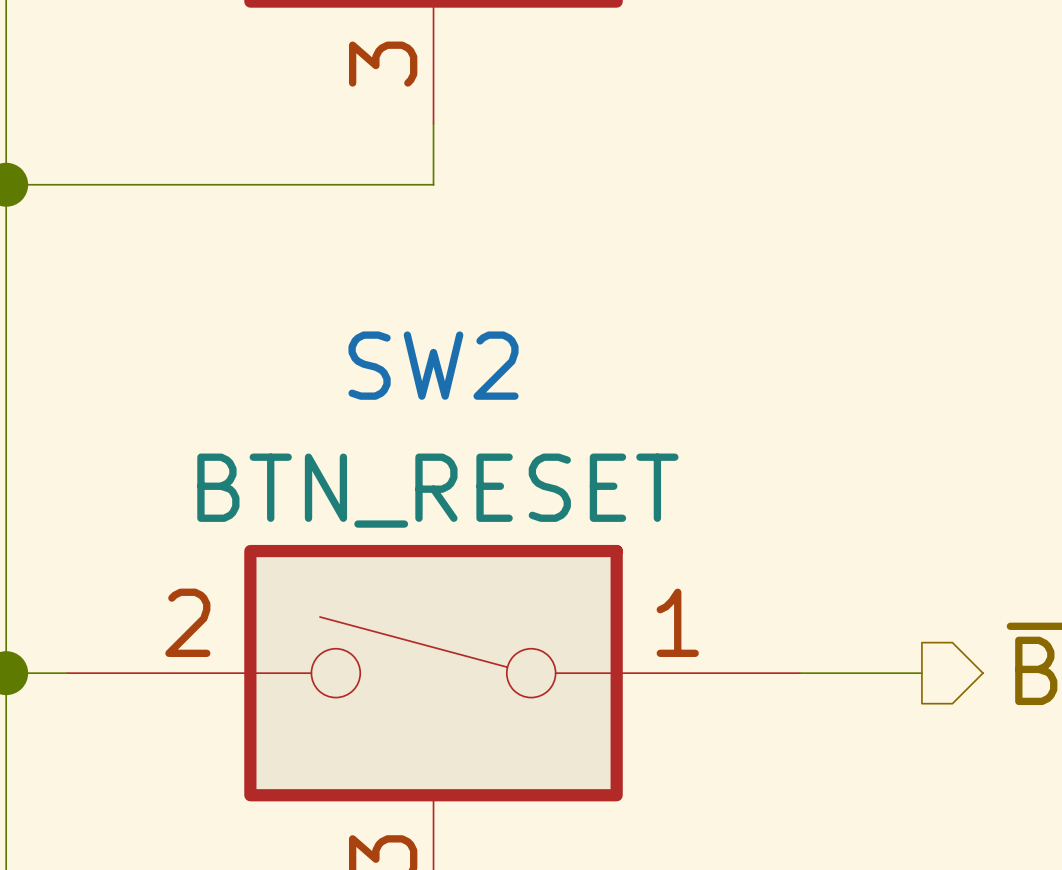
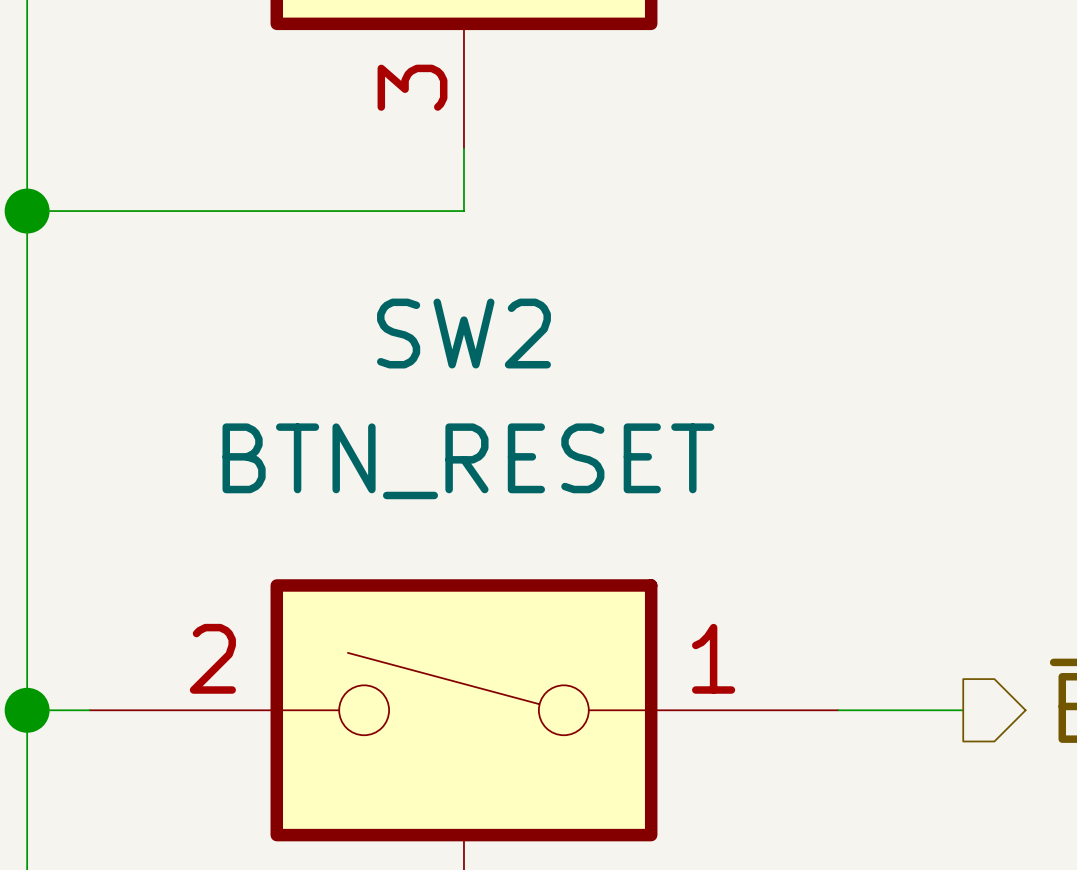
SW2 name position: SW2 (433, 365) -> SW2 (463, 333)
SW2 value position: BTN_RESET (437, 490) -> BTN_RESET (468, 461)

